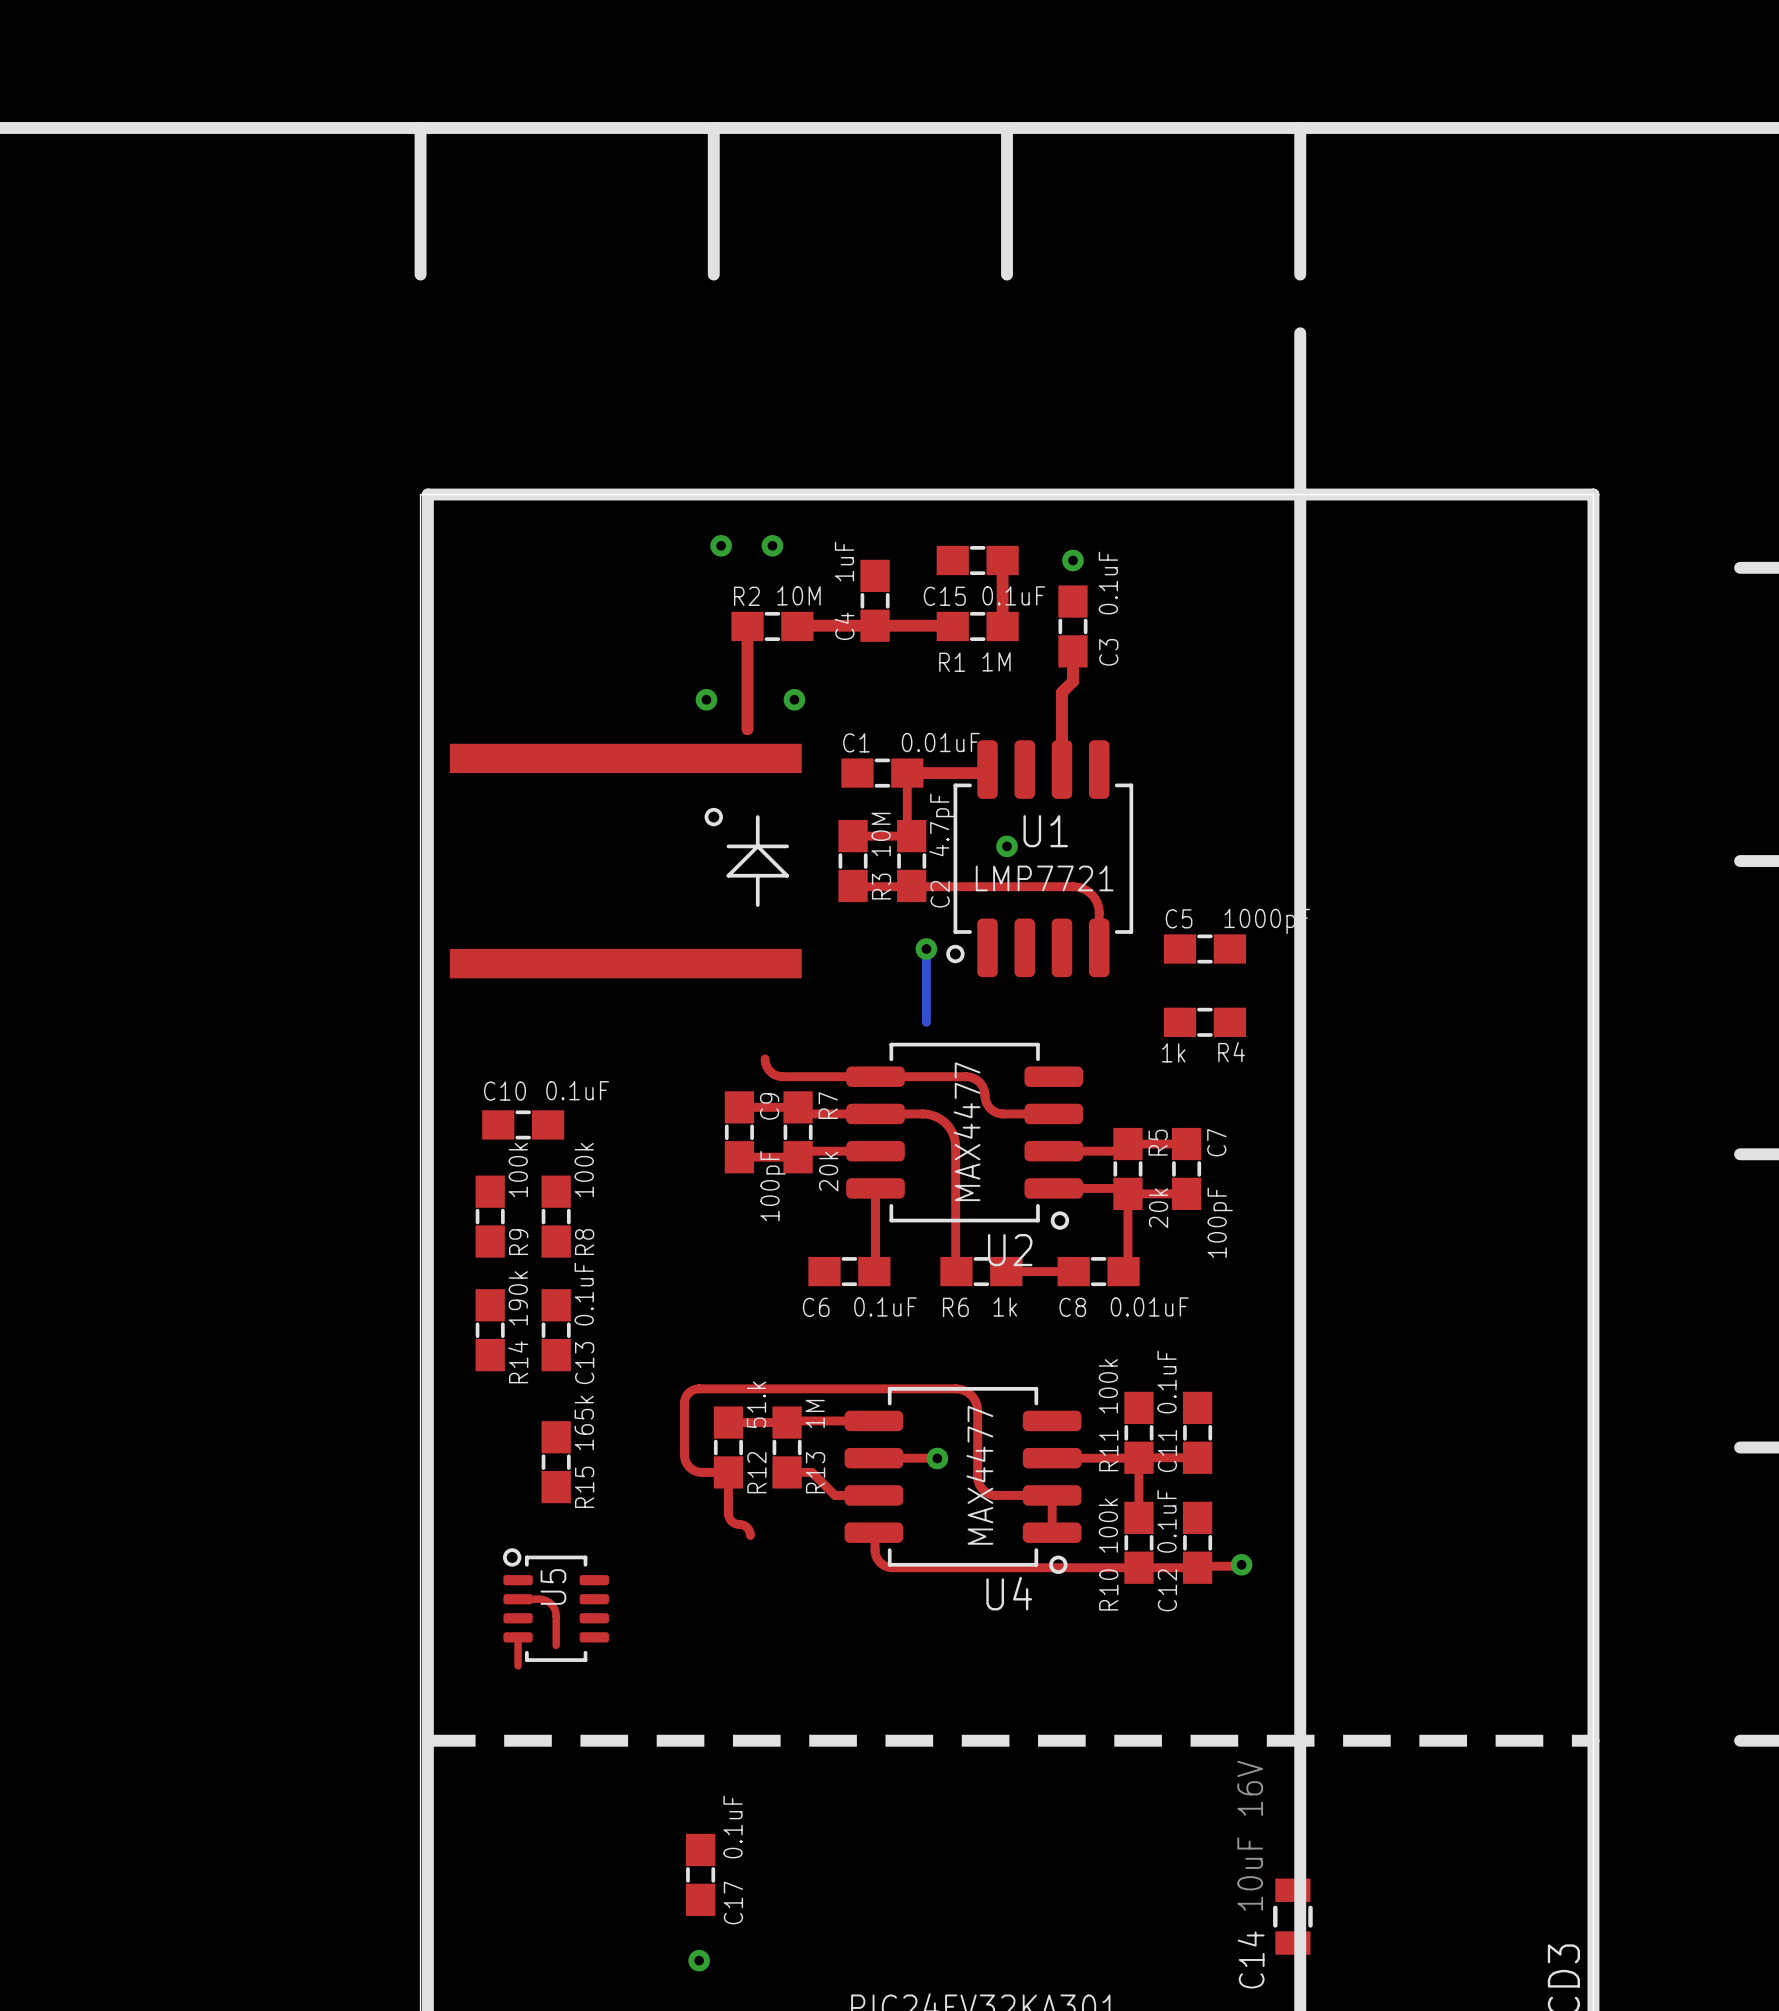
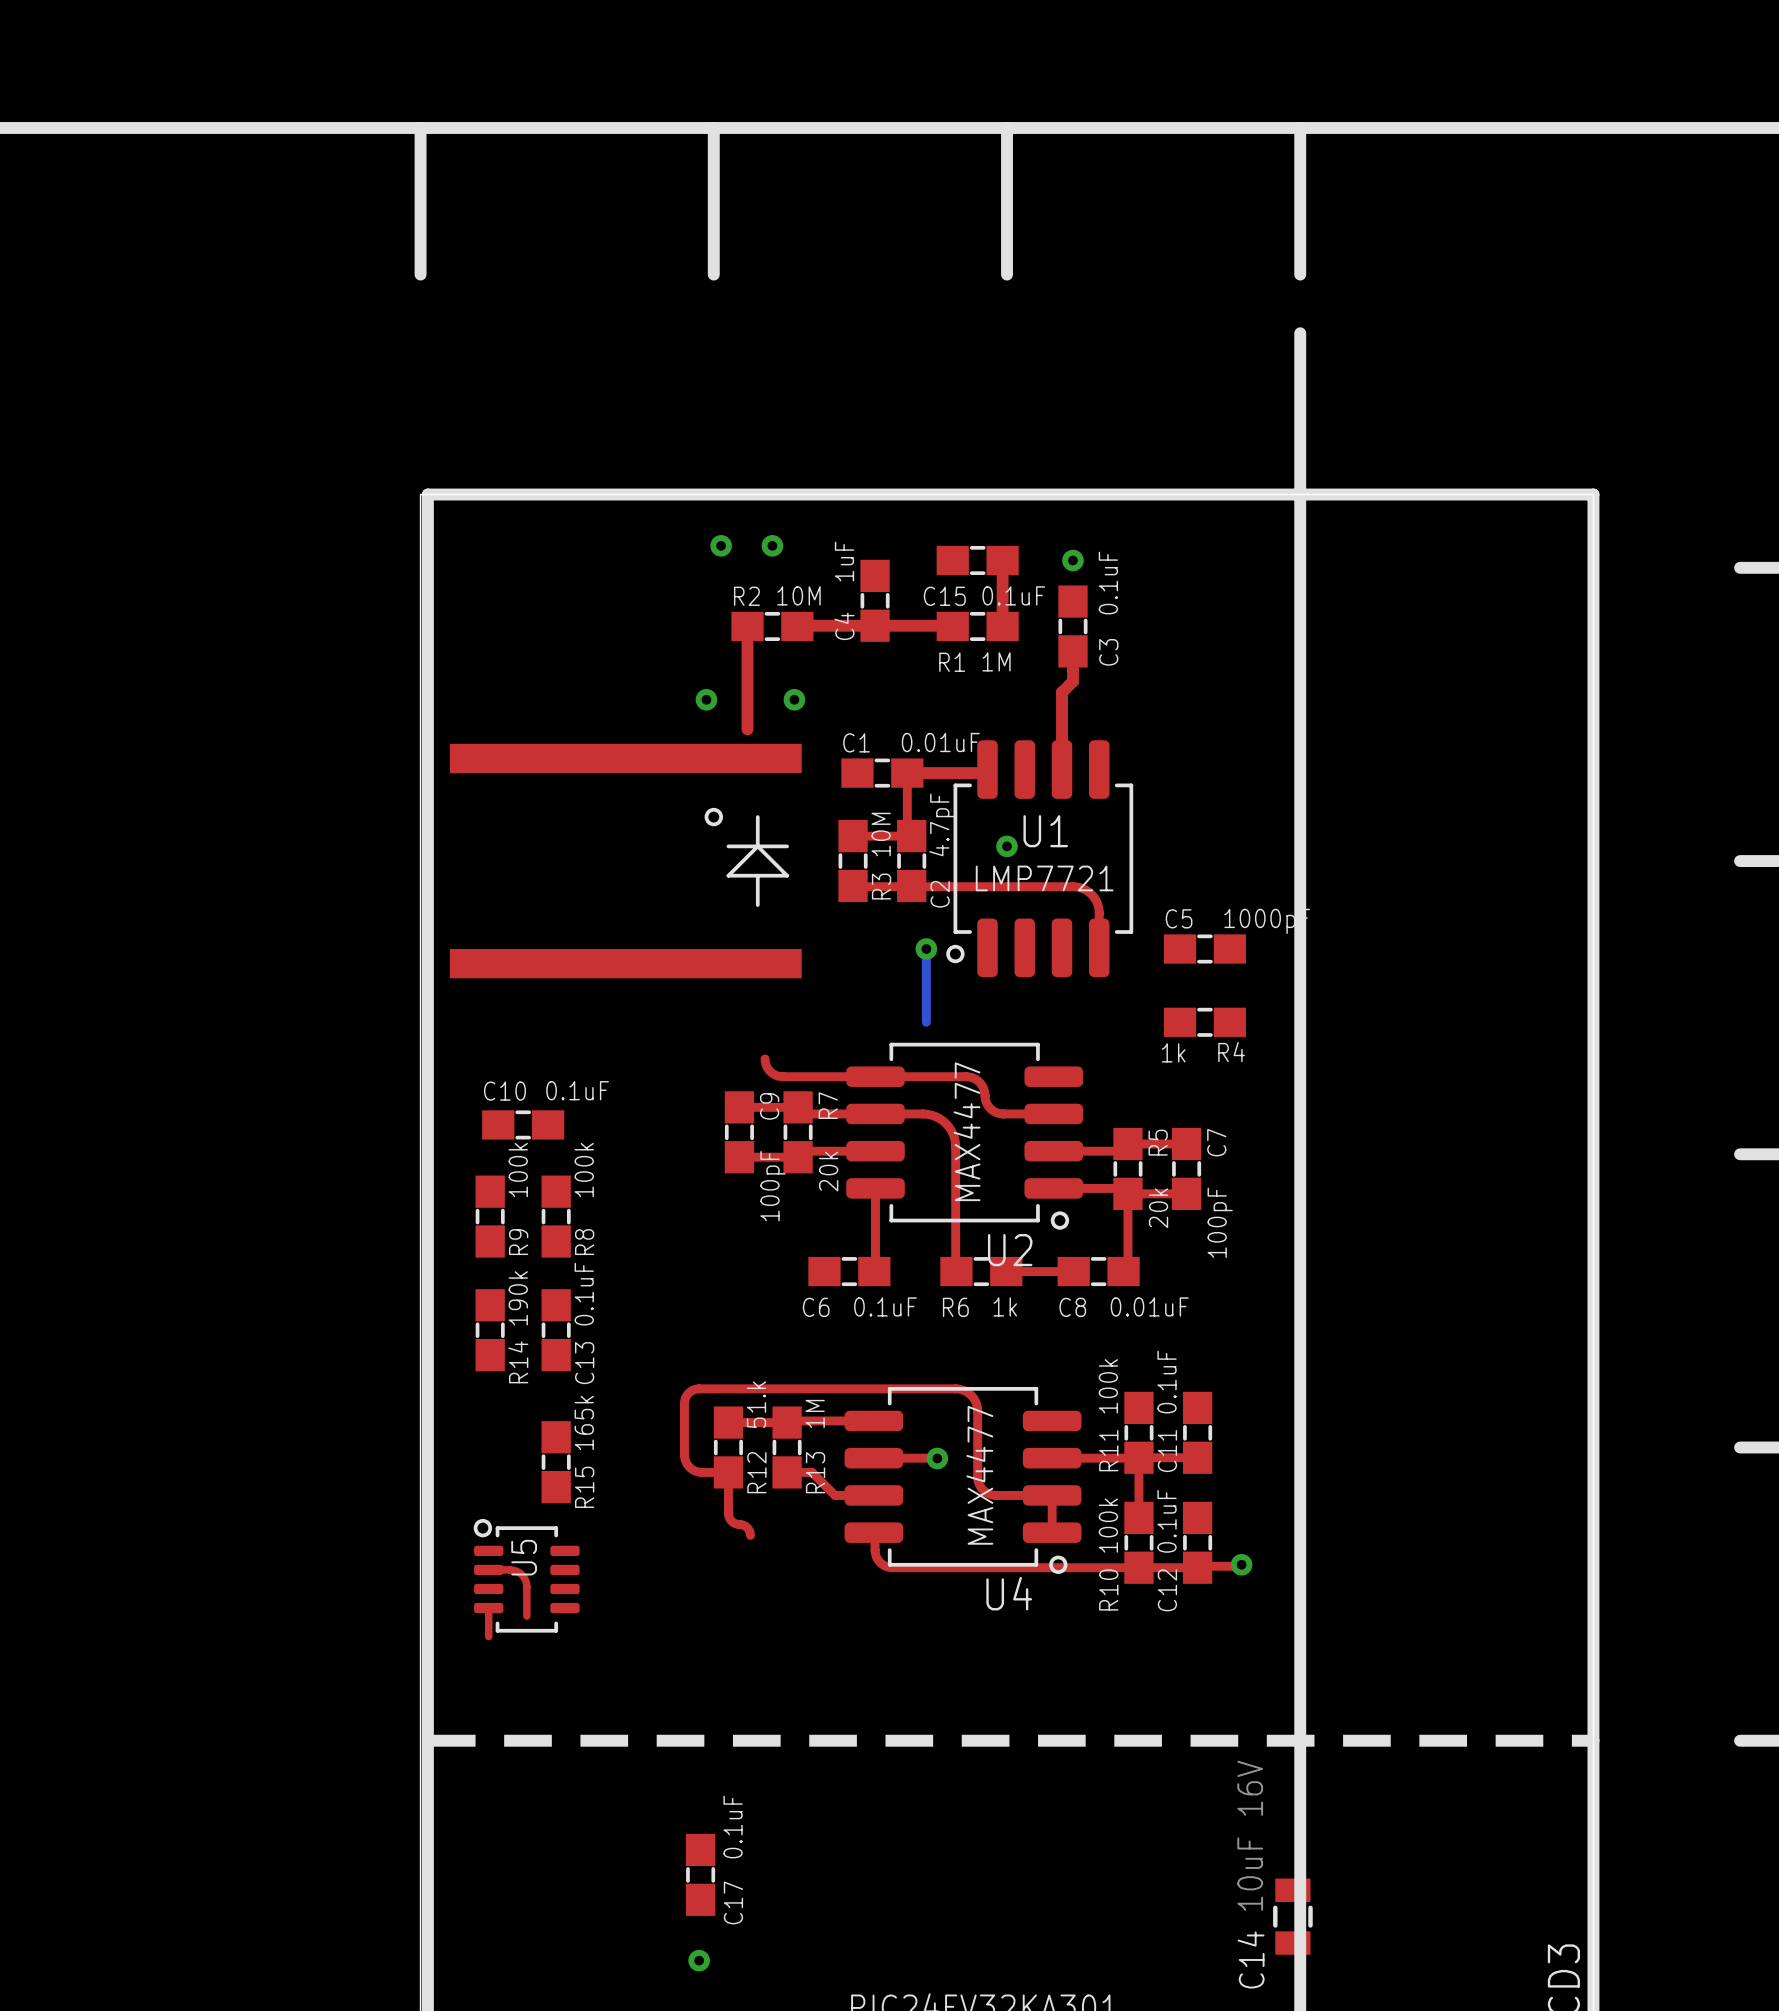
top track: (518, 1599) (541, 1599) (552, 1605) (556, 1613) (556, 1645) -> (488, 1569) (512, 1570) (523, 1576) (526, 1584) (526, 1616)
U5 position: (555, 1605) -> (526, 1575)
top track: (518, 1637) (518, 1665) -> (488, 1608) (488, 1636)

